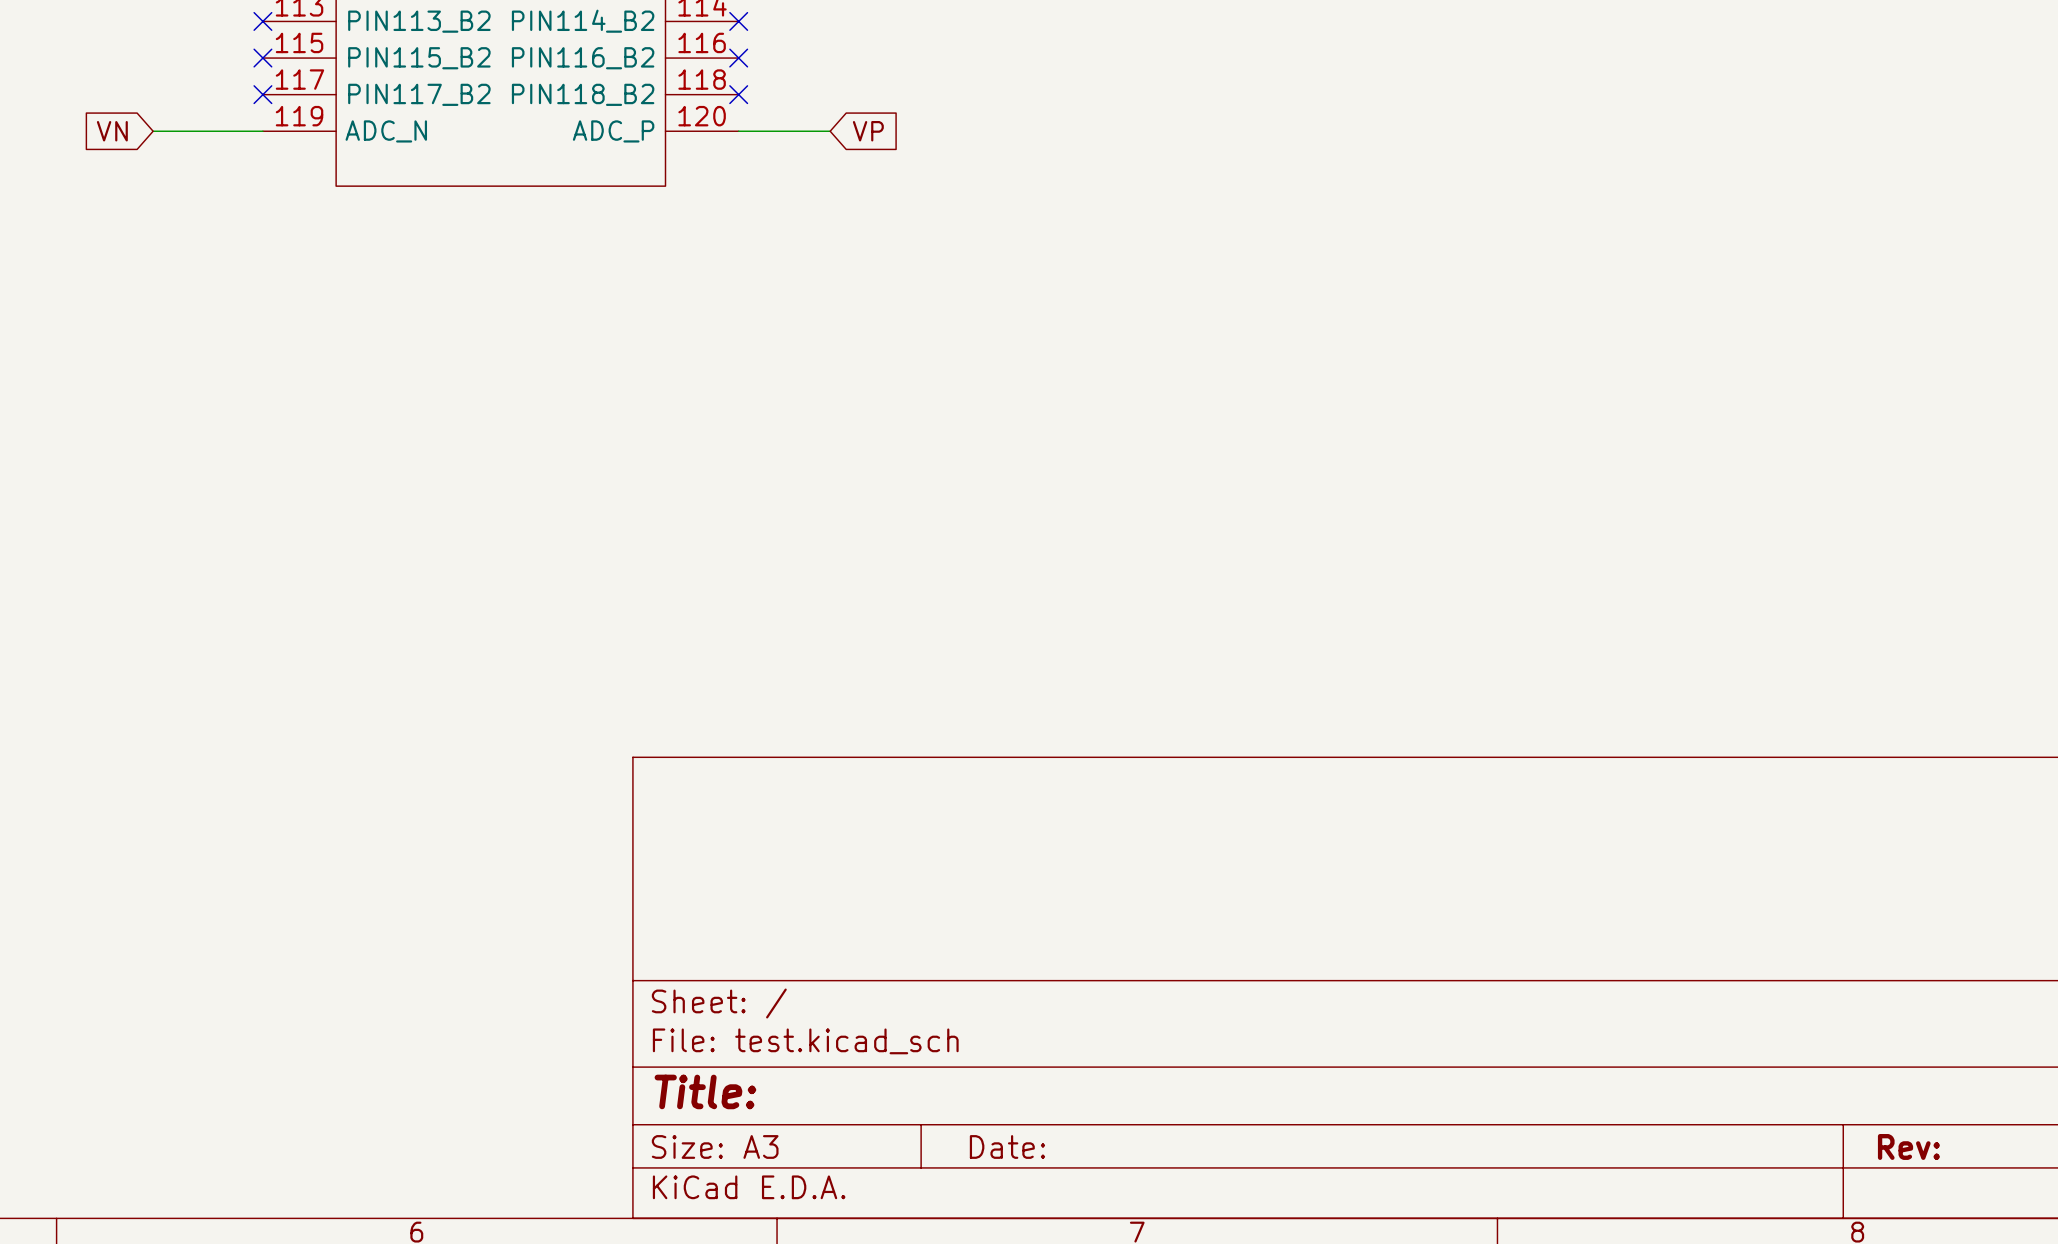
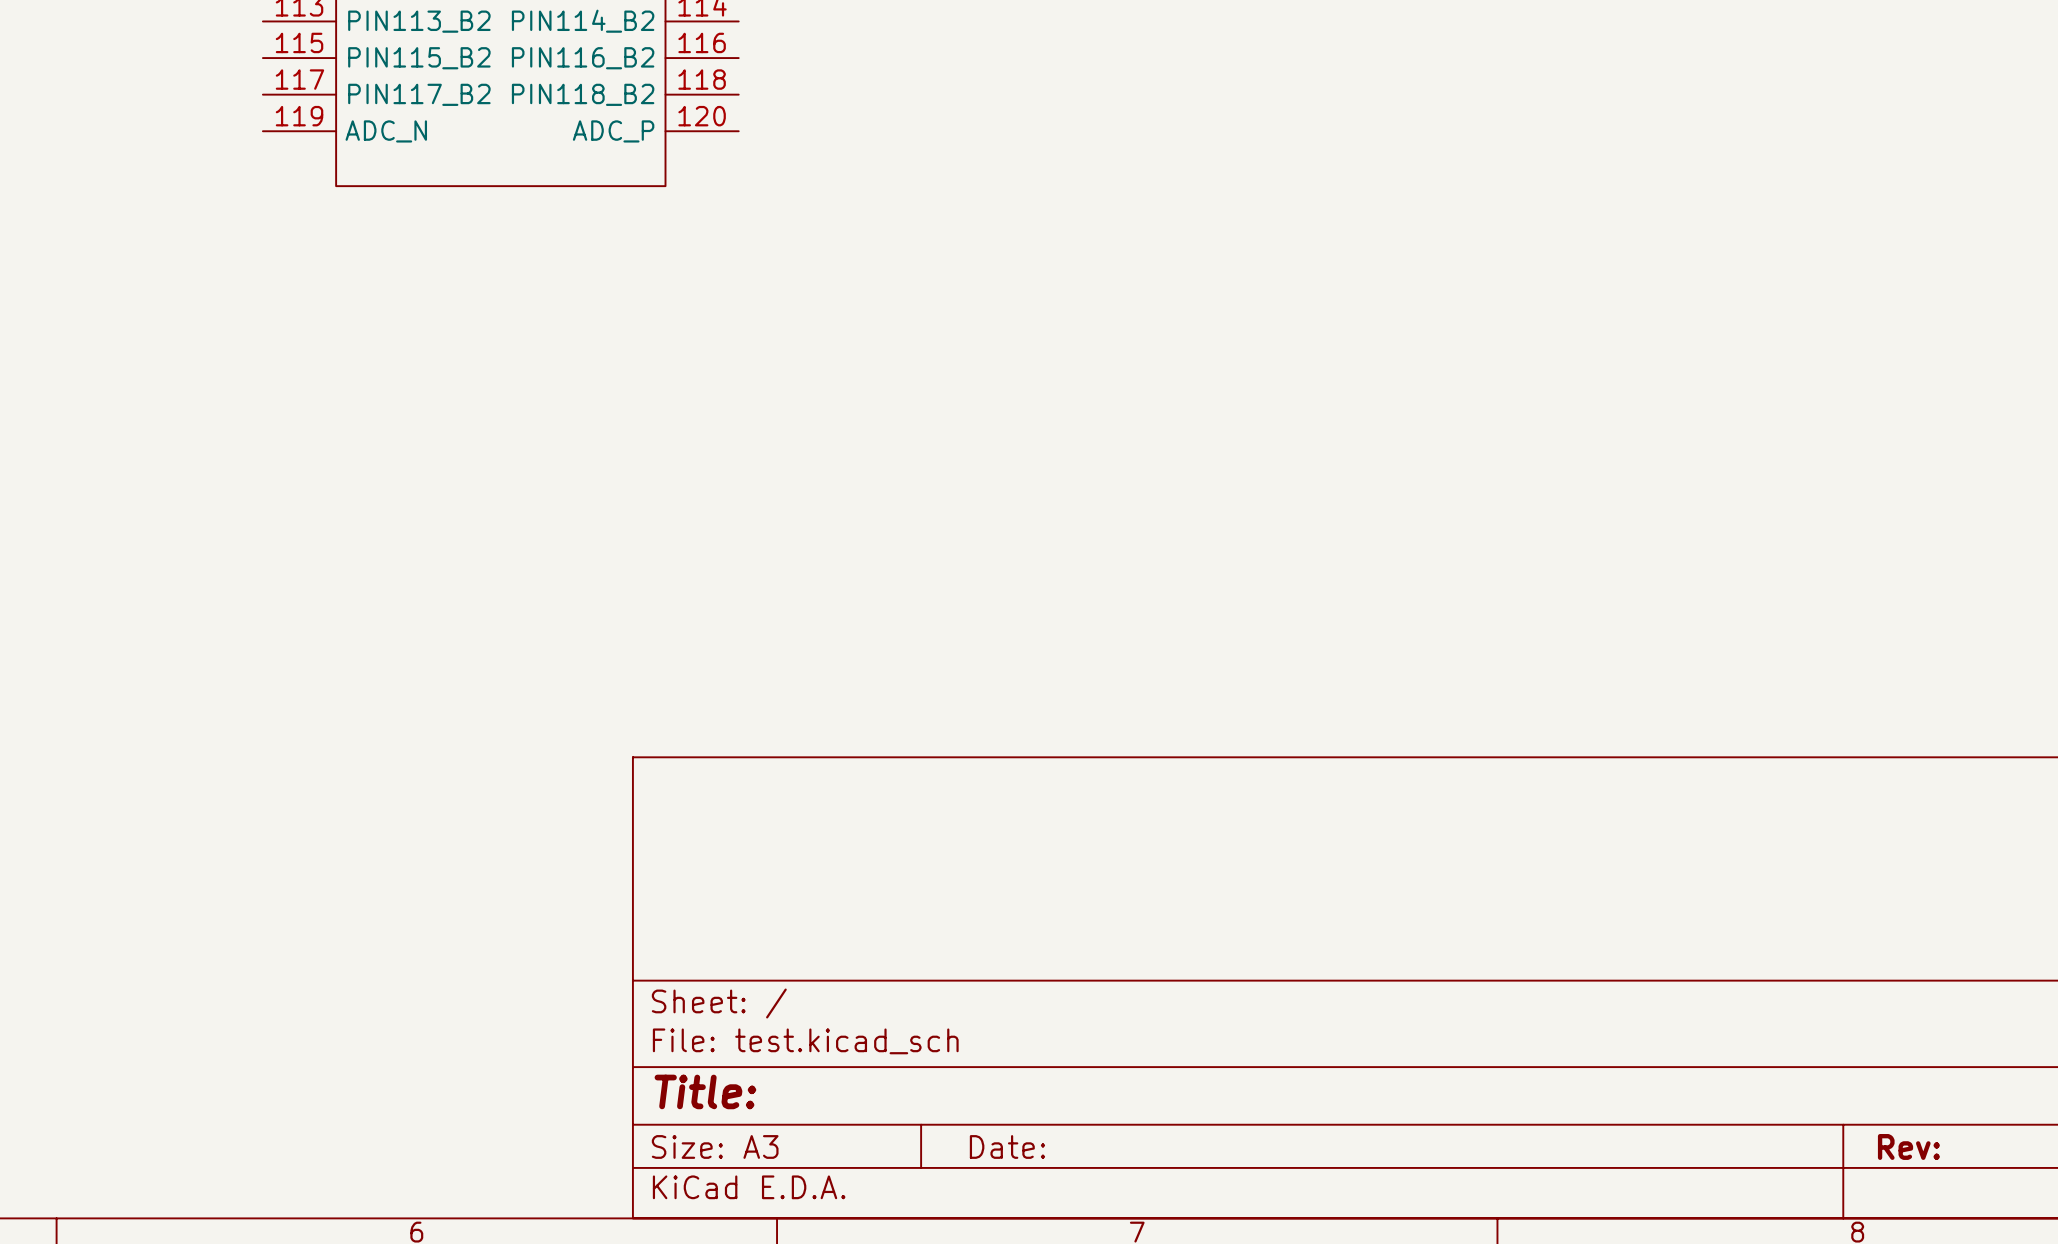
no-connect mark: (262, 21) -> none
no-connect mark: (738, 21) -> none
no-connect mark: (262, 58) -> none
no-connect mark: (738, 58) -> none
no-connect mark: (262, 94) -> none
no-connect mark: (738, 94) -> none
global label: VN (112, 131) -> none
wire: (153, 131) (262, 131) -> none
wire: (738, 131) (830, 131) -> none
global label: VP (868, 131) -> none

